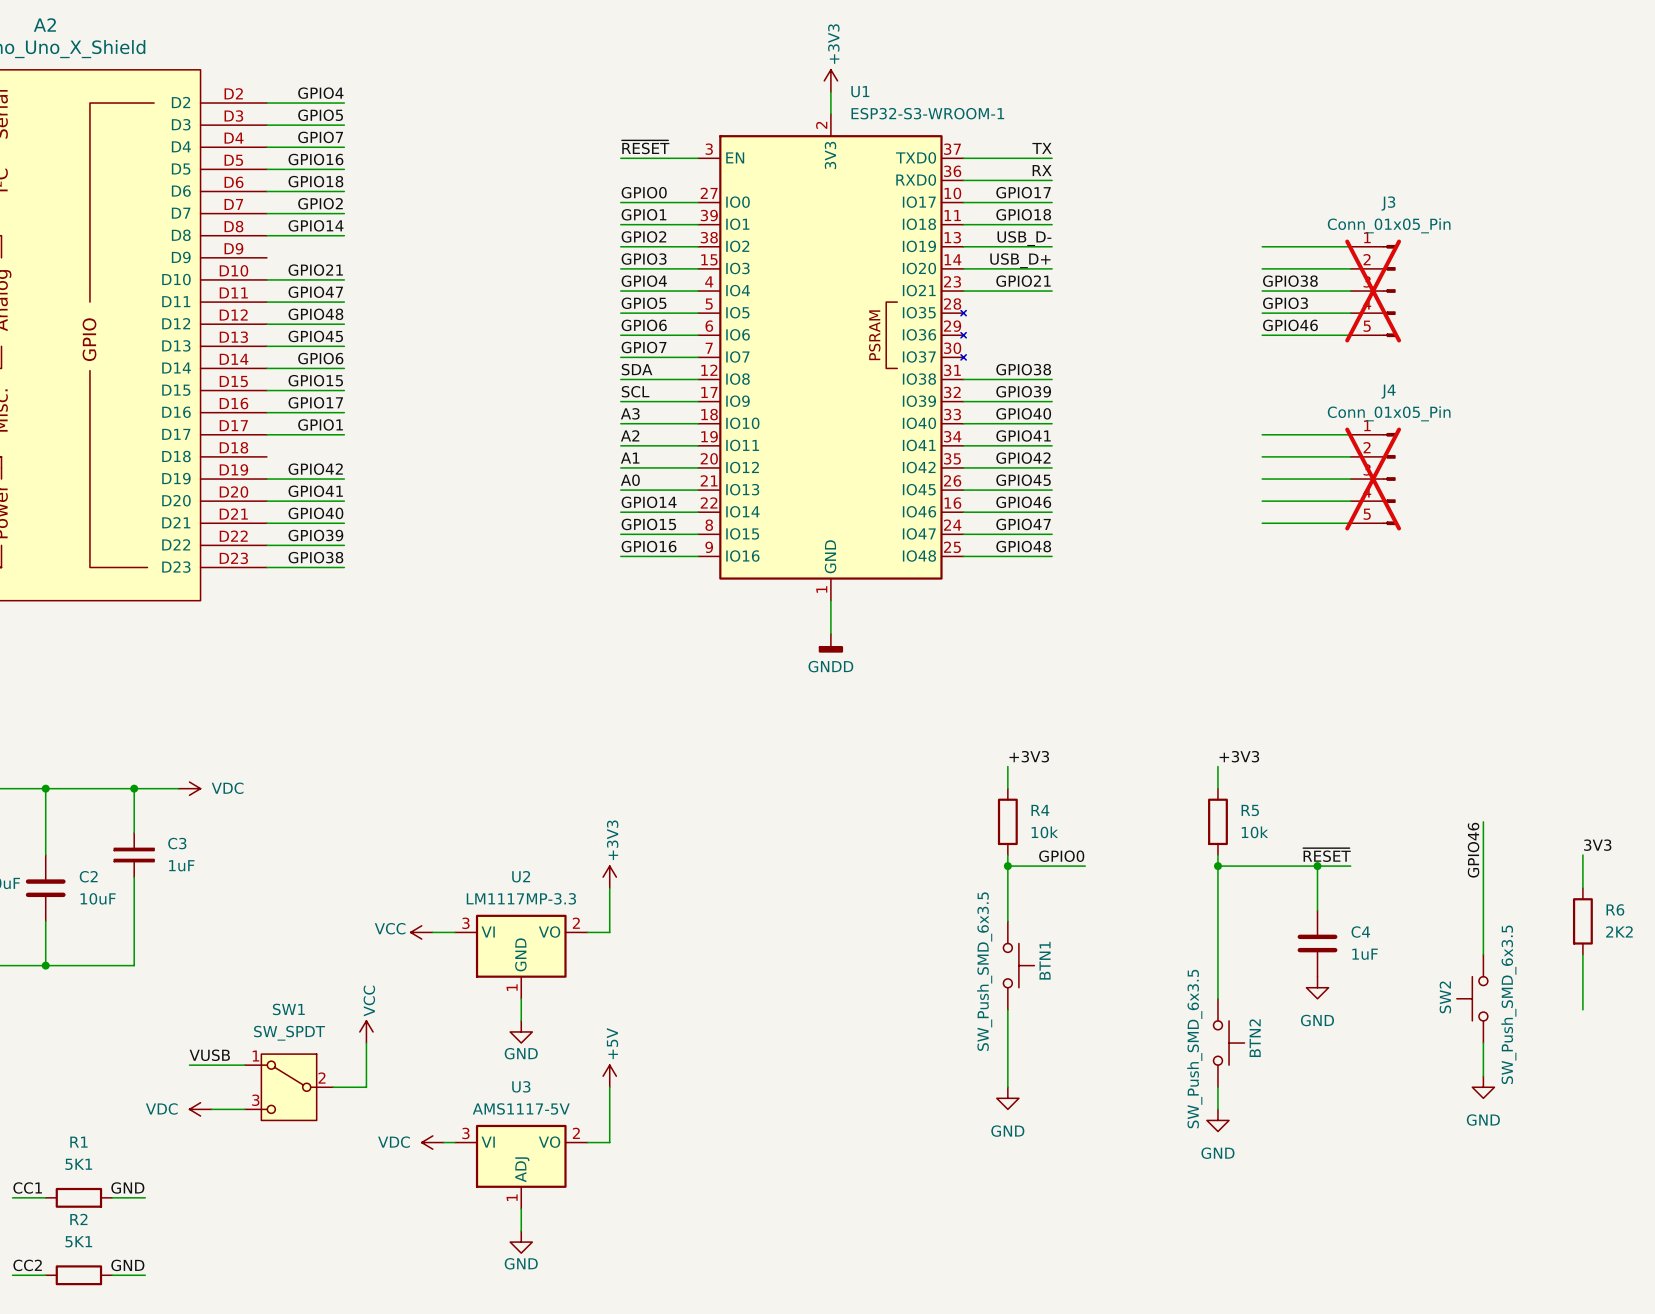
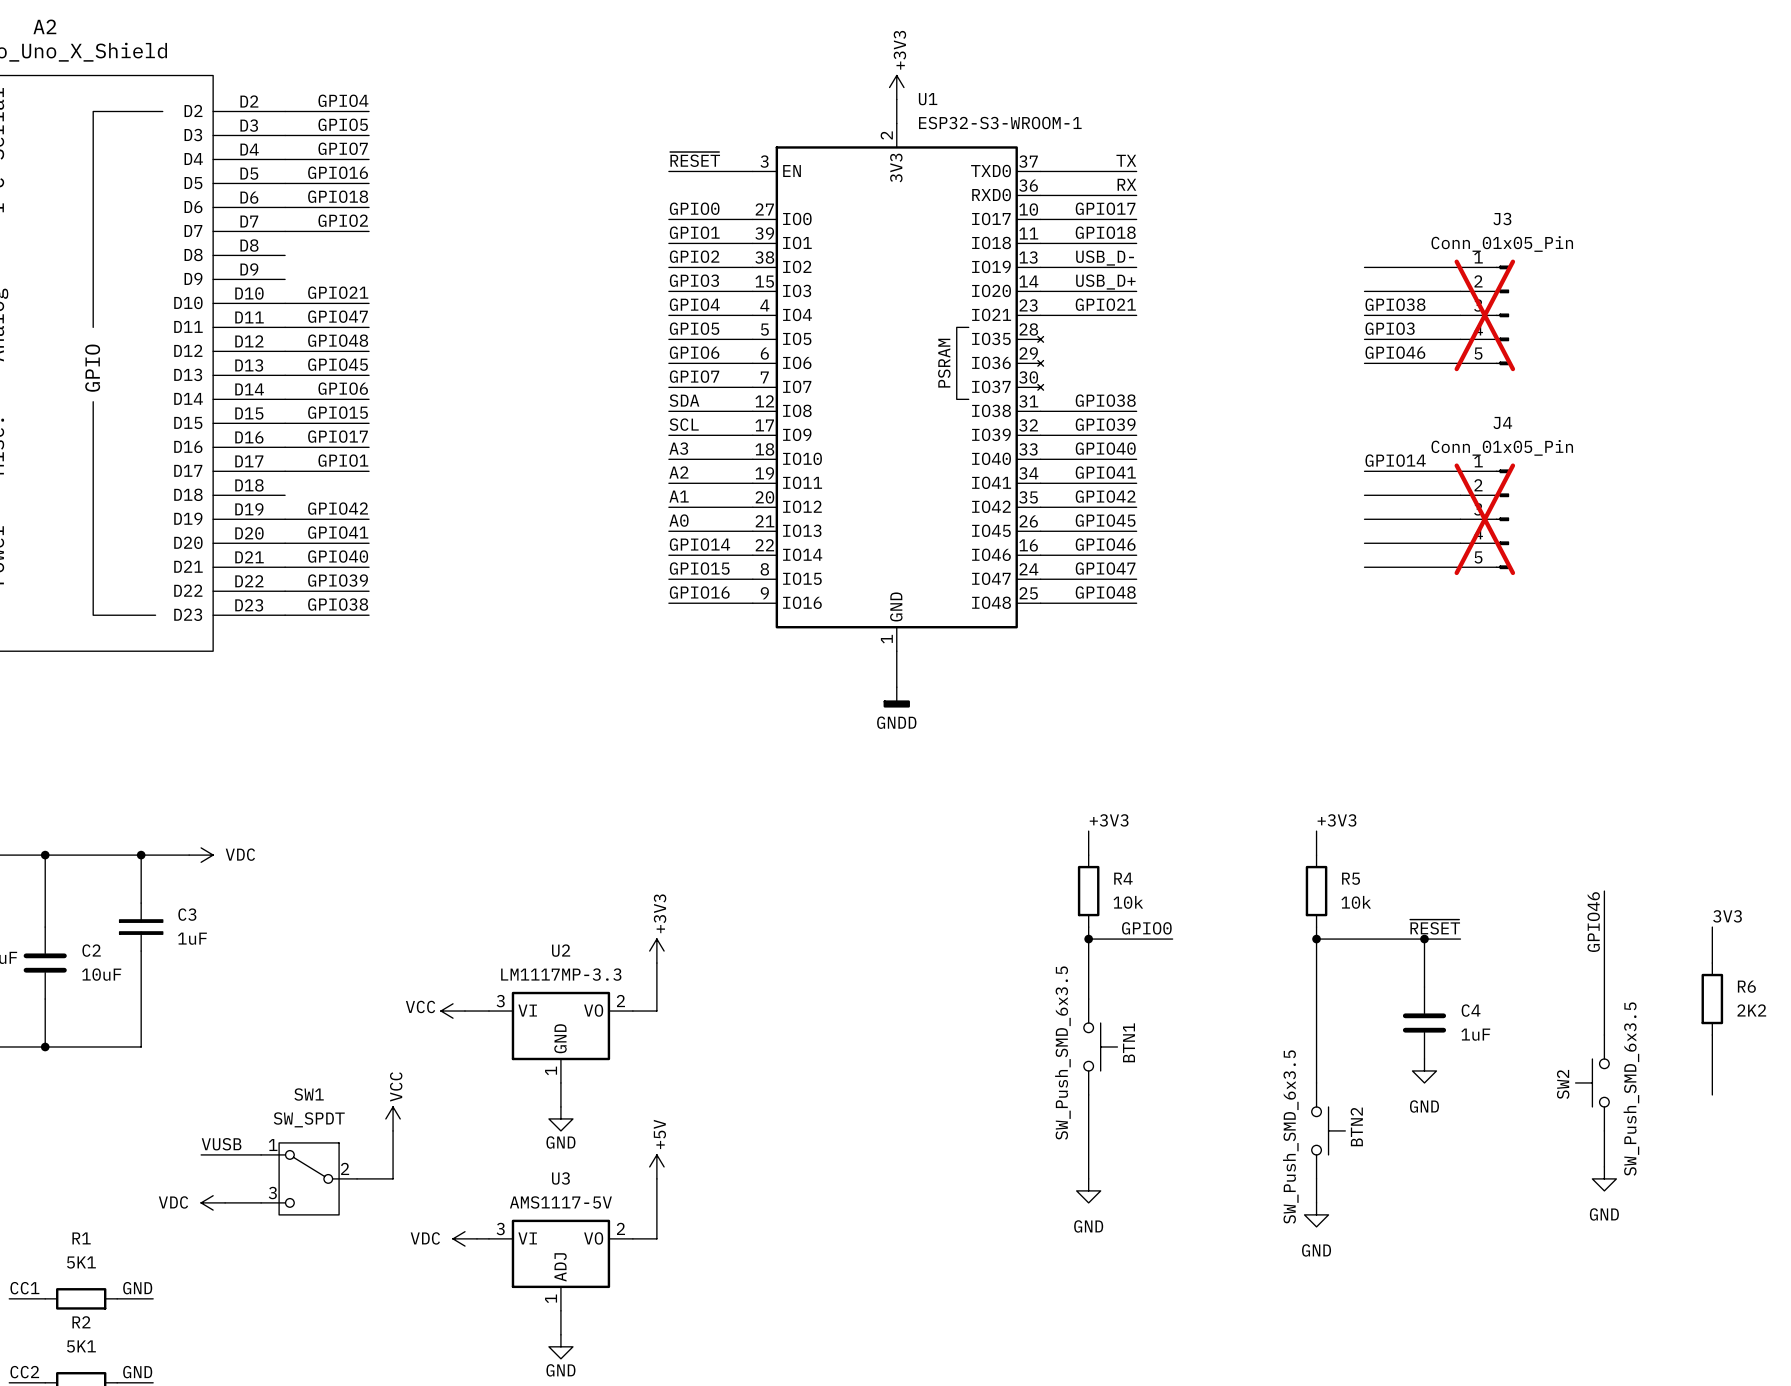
label: GPIO14 (316, 225) -> none
wire: (266, 235) (344, 235) -> none
label: none -> GPIO14 (1395, 460)

